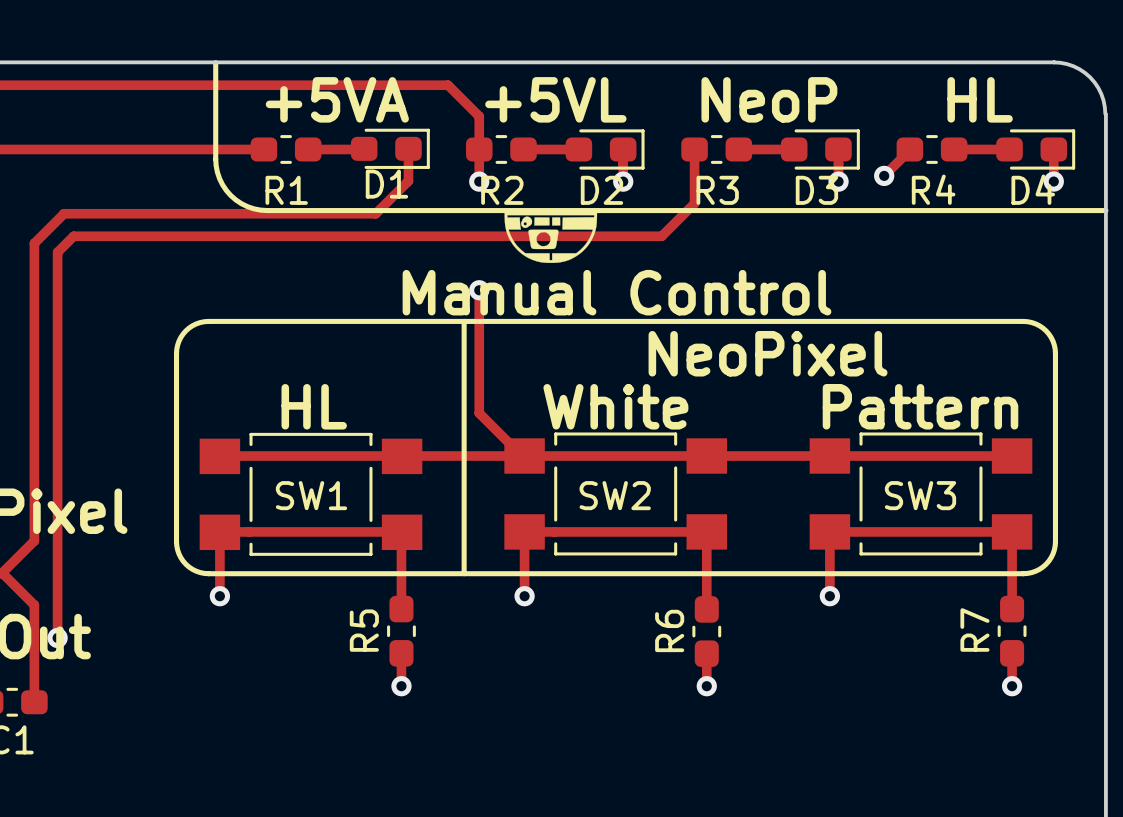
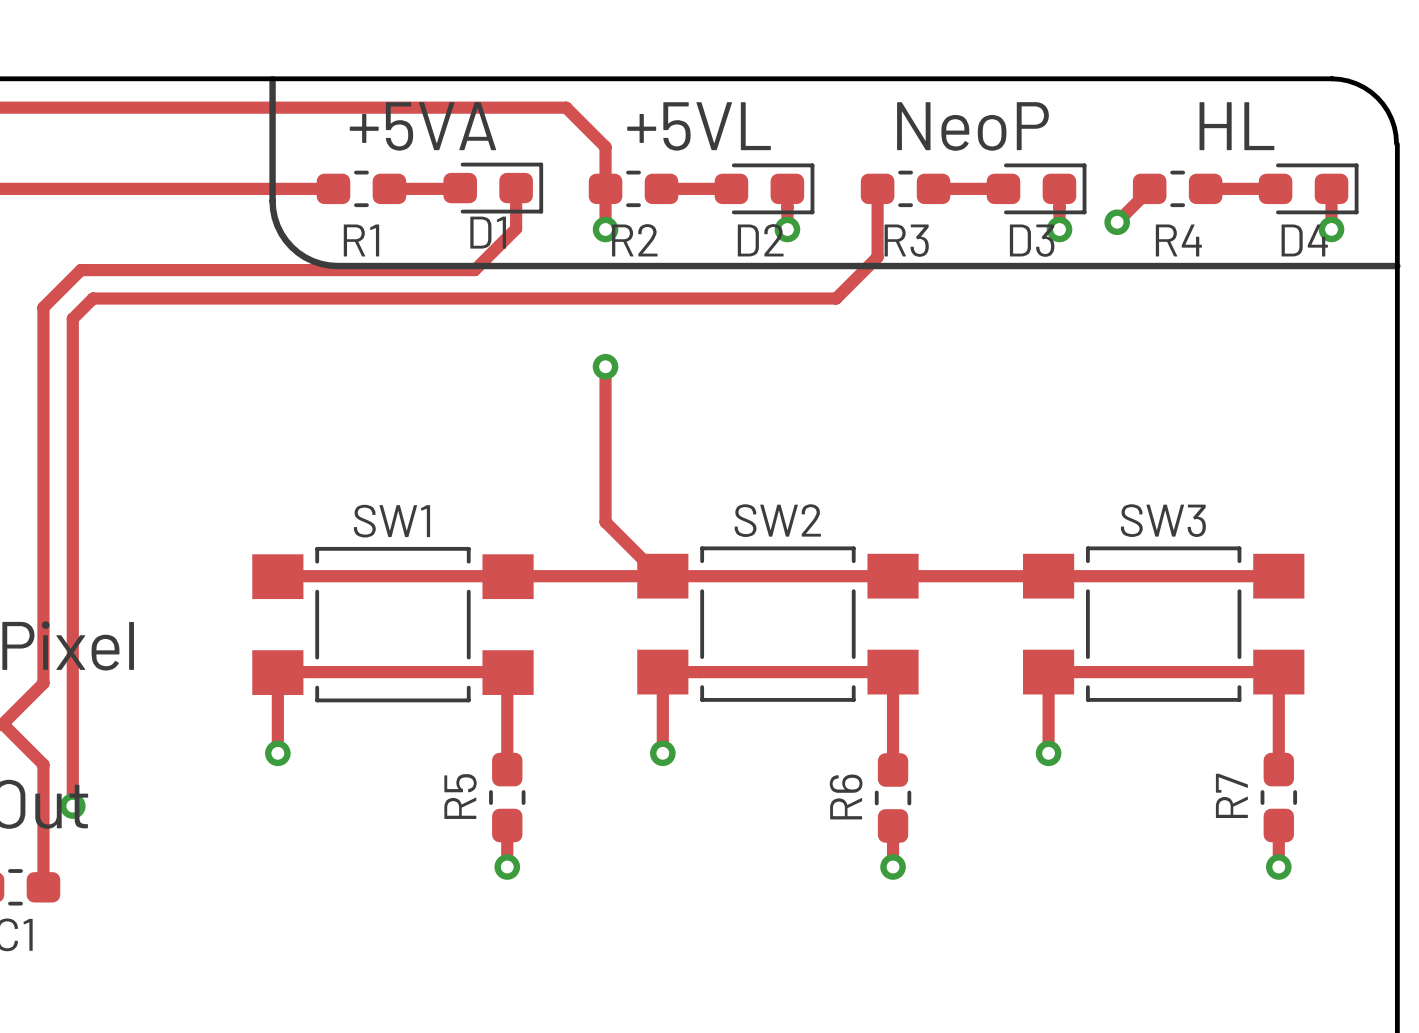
drawing: [504, 211, 598, 263] -> none
text: Manual Control (617, 292) -> none
line: (208, 321) (1031, 322) (1039, 325) (1048, 334) (1055, 349) (1054, 549) (1048, 561) (1042, 567) (1035, 571) (1023, 573) (200, 572) (192, 569) (183, 561) (176, 545) (176, 353) (178, 341) (185, 330) (196, 323) (208, 321) -> none
line: (464, 321) (464, 573) -> none
text: NeoPixel (768, 353) -> none
text: HL (314, 406) -> none
text: White (615, 406) -> none
text: Pattern (920, 406) -> none
SW1 name position: SW1 (311, 495) -> SW1 (392, 521)
SW2 name position: SW2 (615, 495) -> SW2 (777, 520)
SW3 name position: SW3 (920, 495) -> SW3 (1163, 520)

